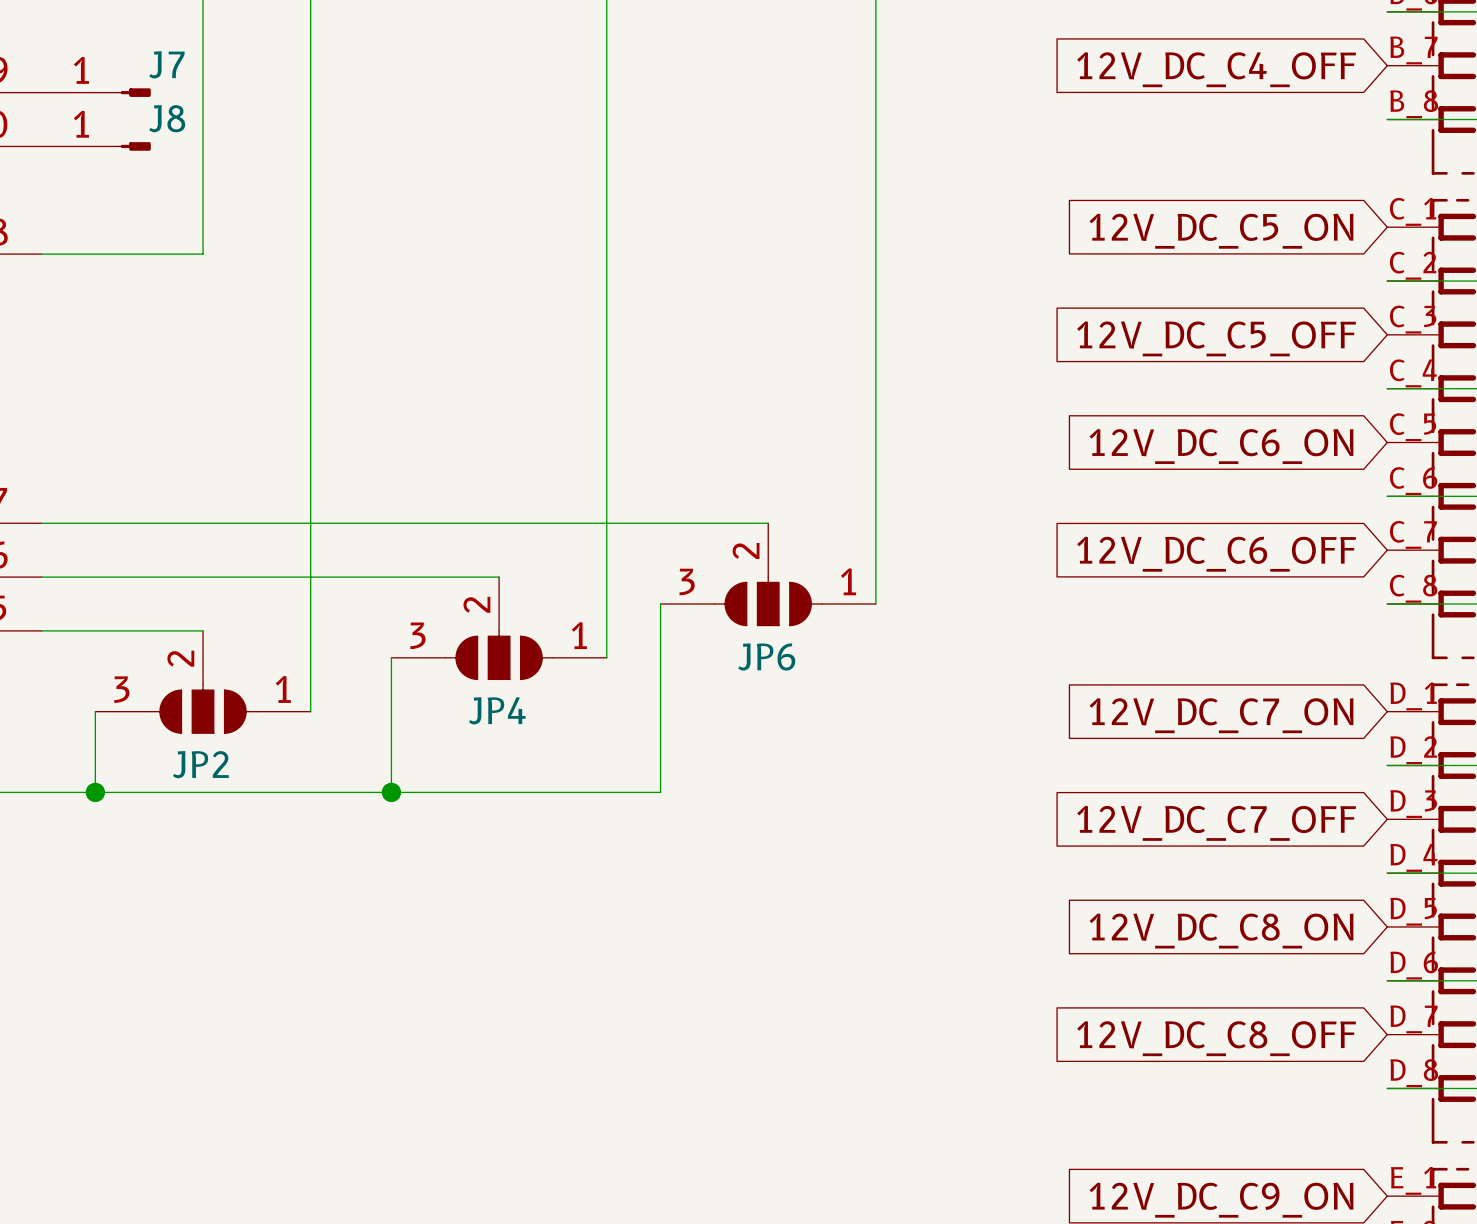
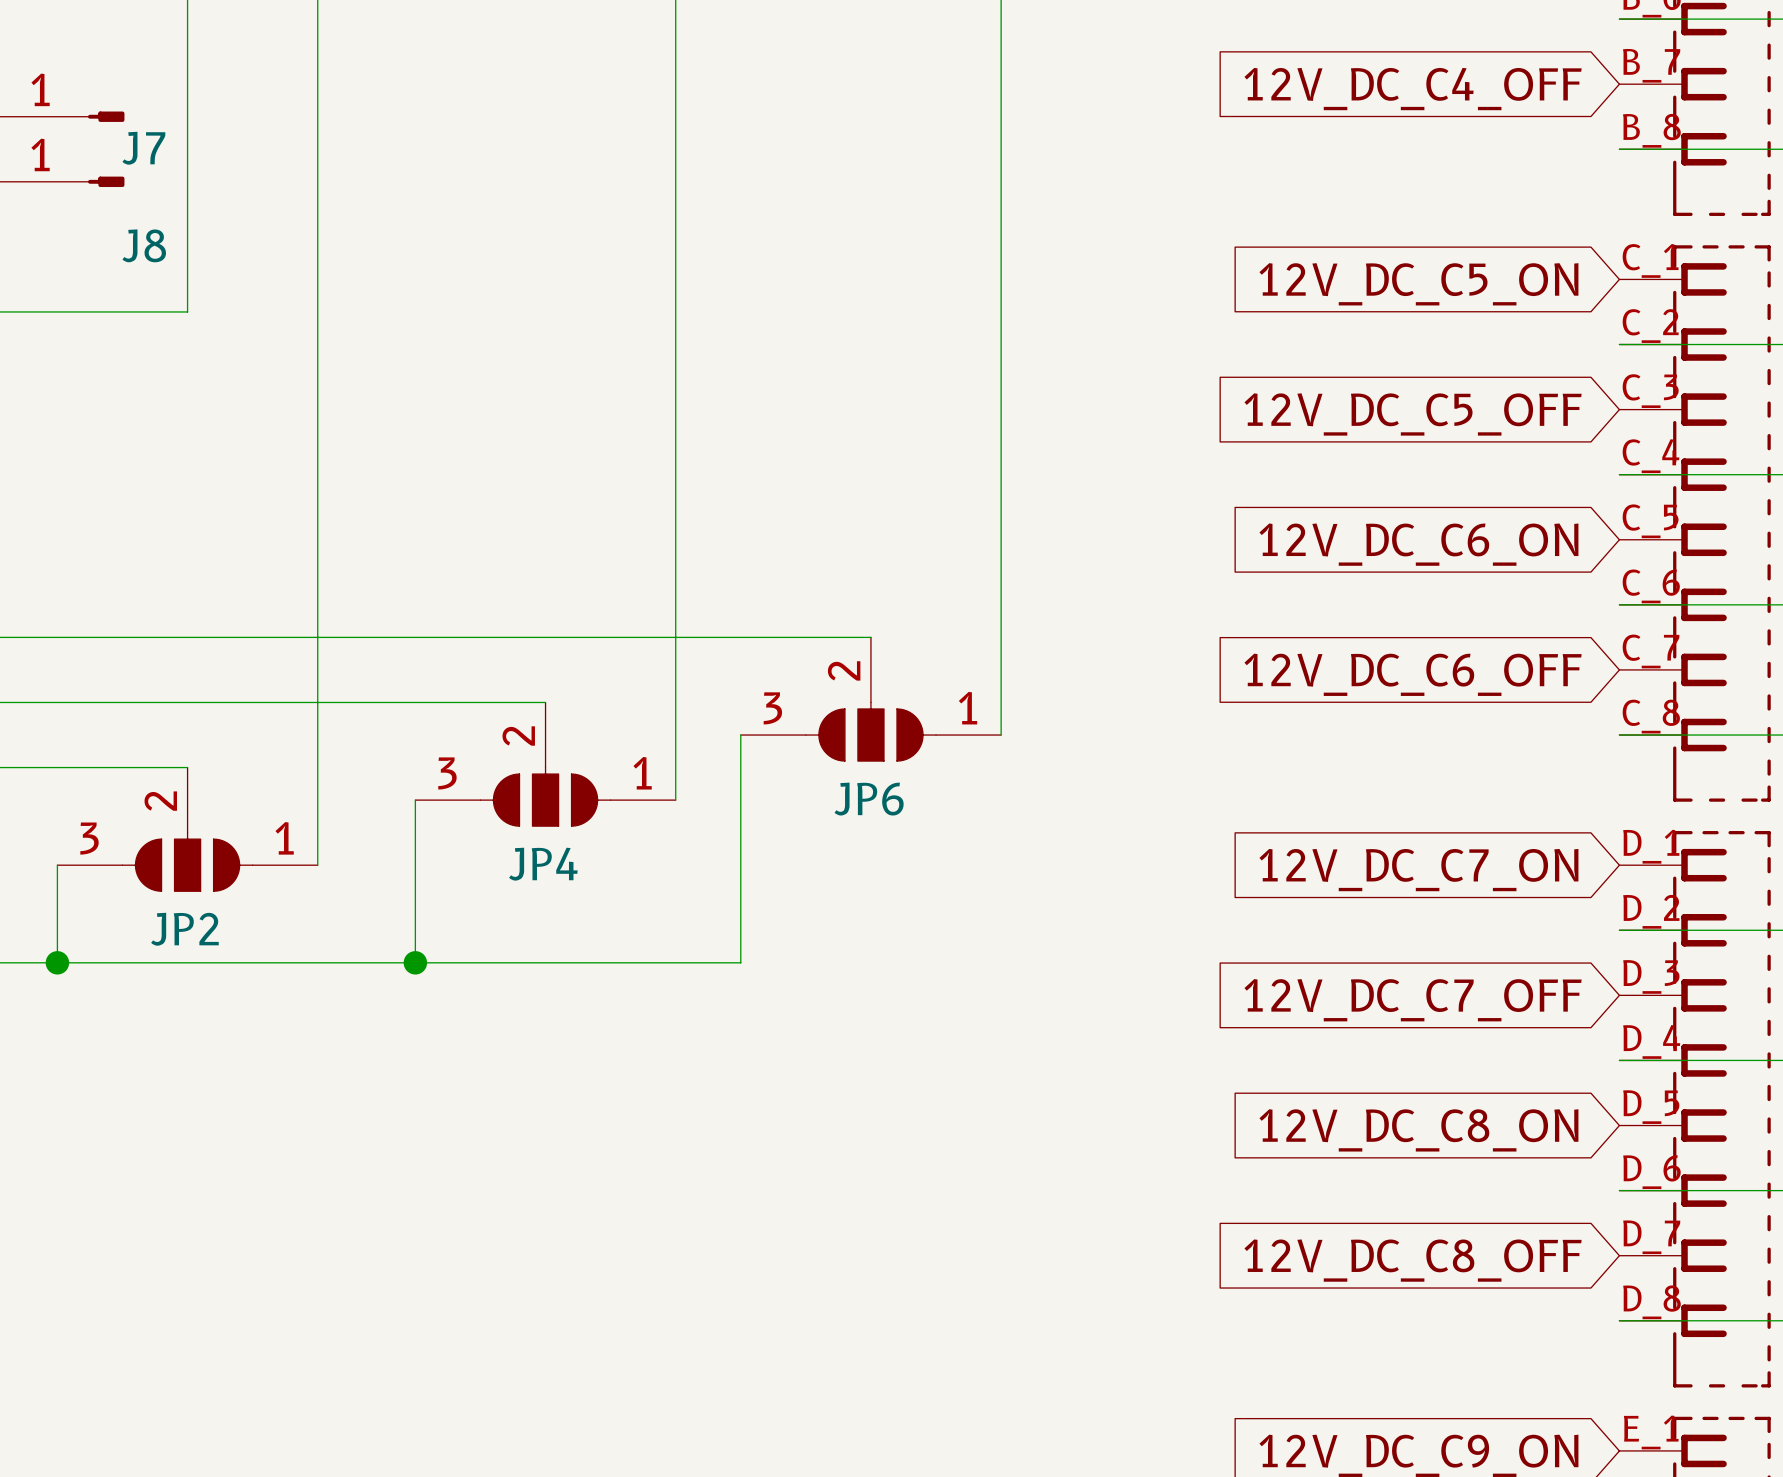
J7 name position: J7 (166, 64) -> J7 (143, 148)
J8 name position: J8 (167, 118) -> J8 (144, 245)

